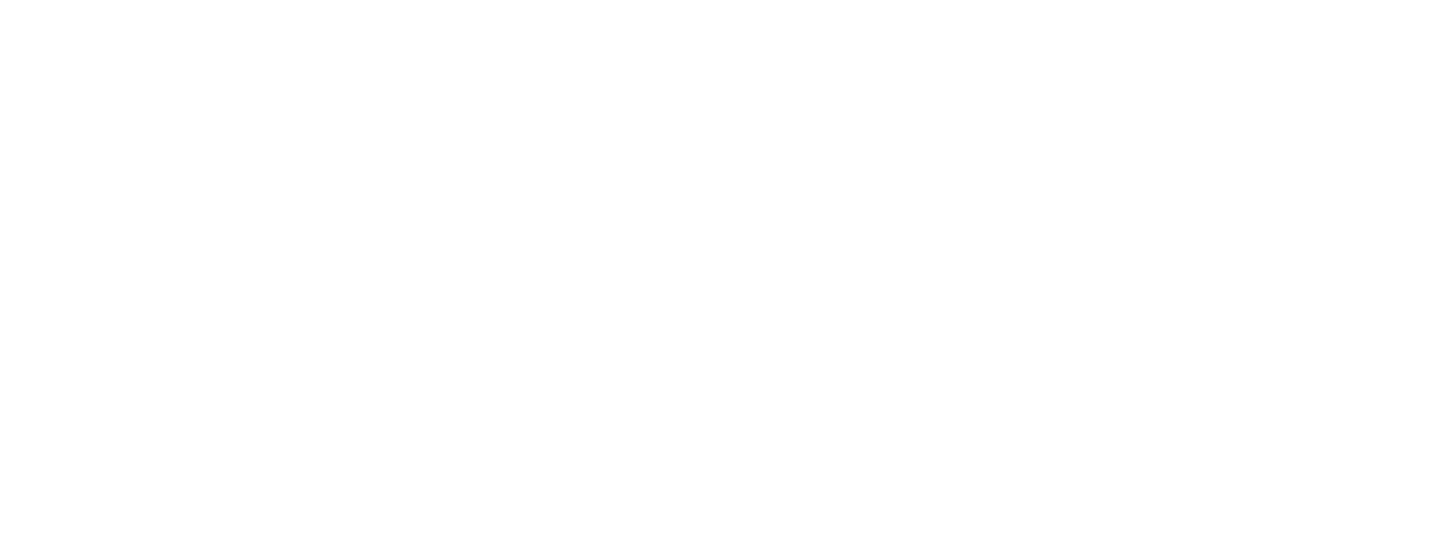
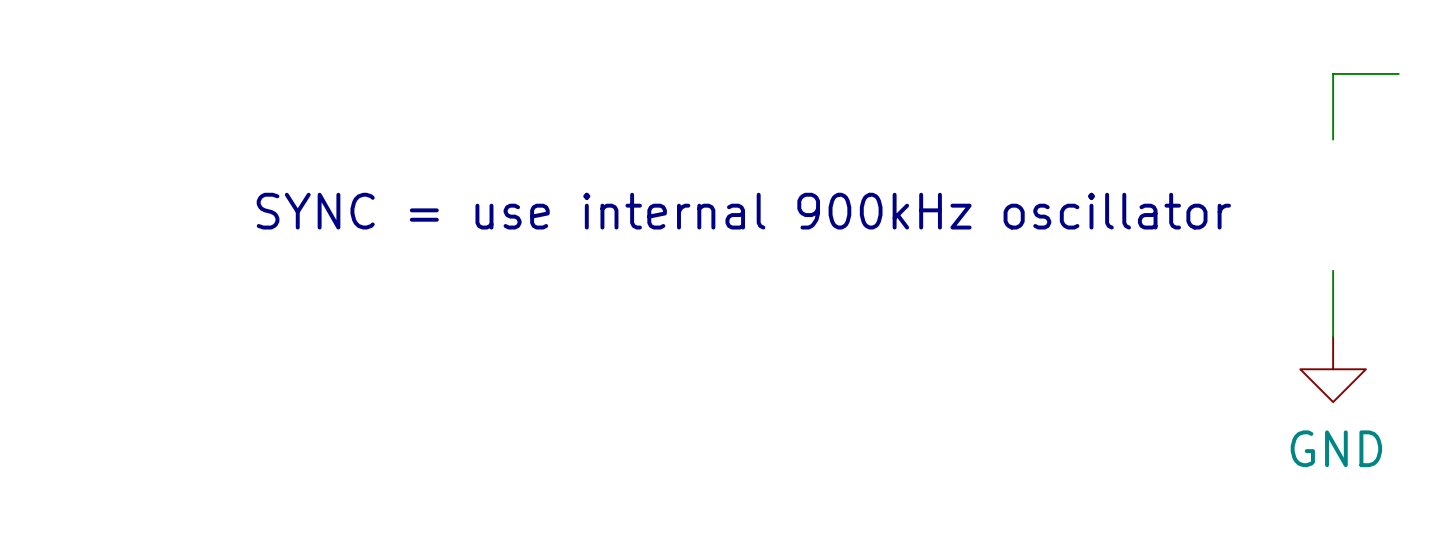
wire: none -> (1398, 73) (1333, 73) (1333, 139)
text: none -> SYNC = use internal 900kHz oscillator (743, 211)
wire: none -> (1333, 270) (1333, 336)
power symbol: none -> GND (1333, 369)

